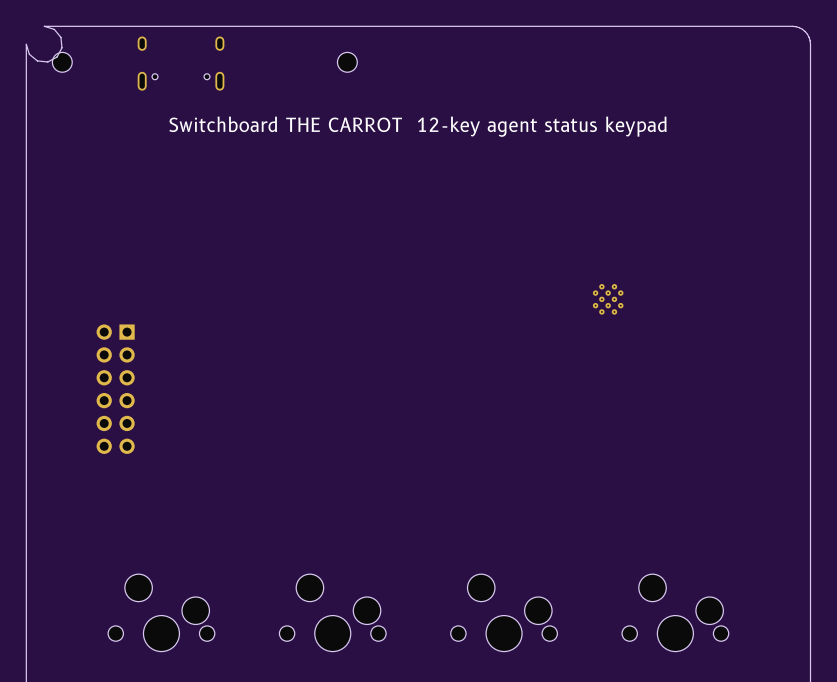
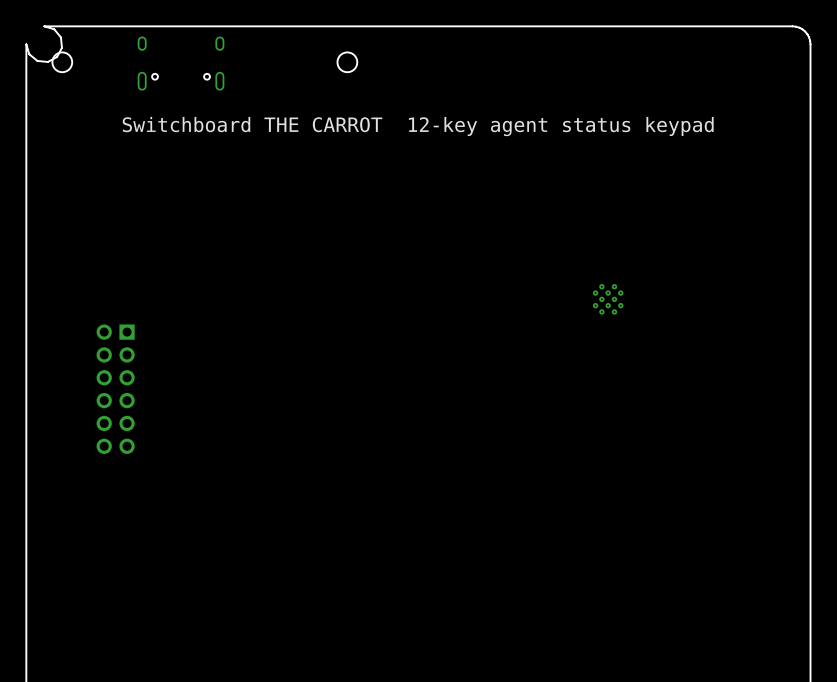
part: (161, 612) -> none
part: (332, 612) -> none
part: (504, 612) -> none
part: (675, 612) -> none

